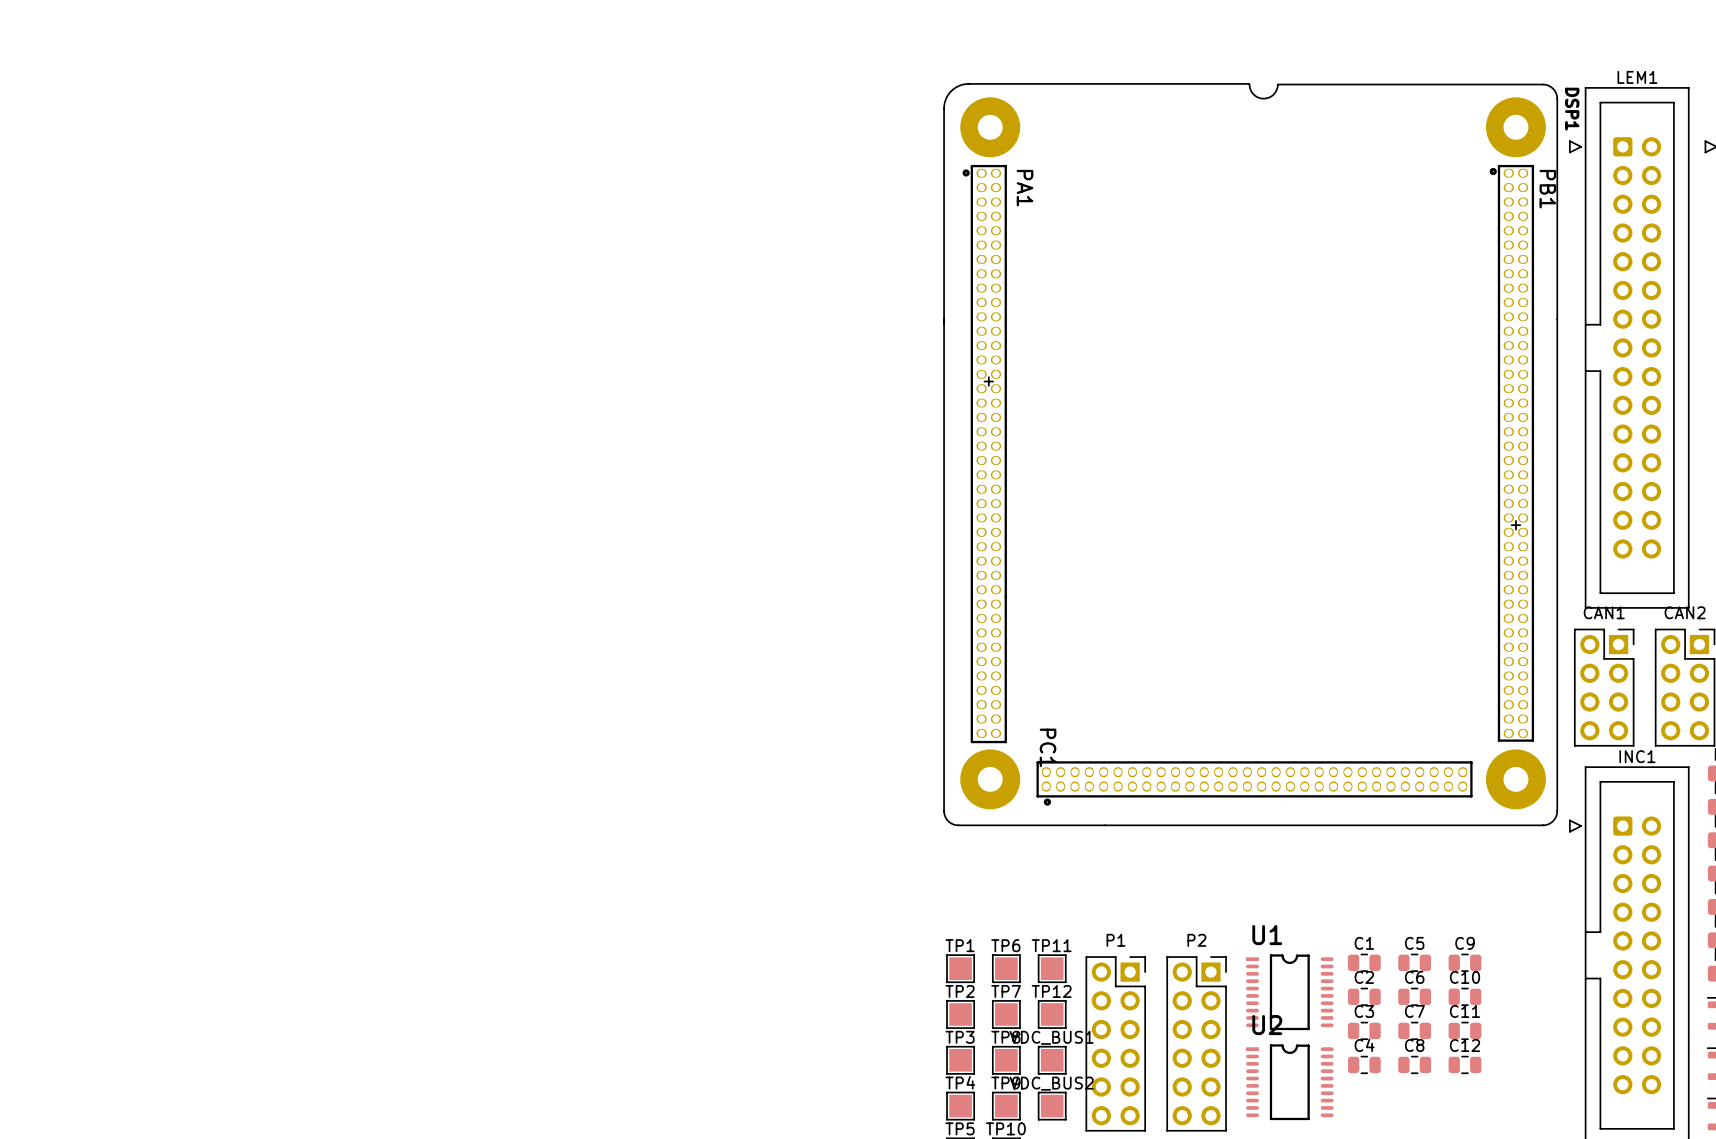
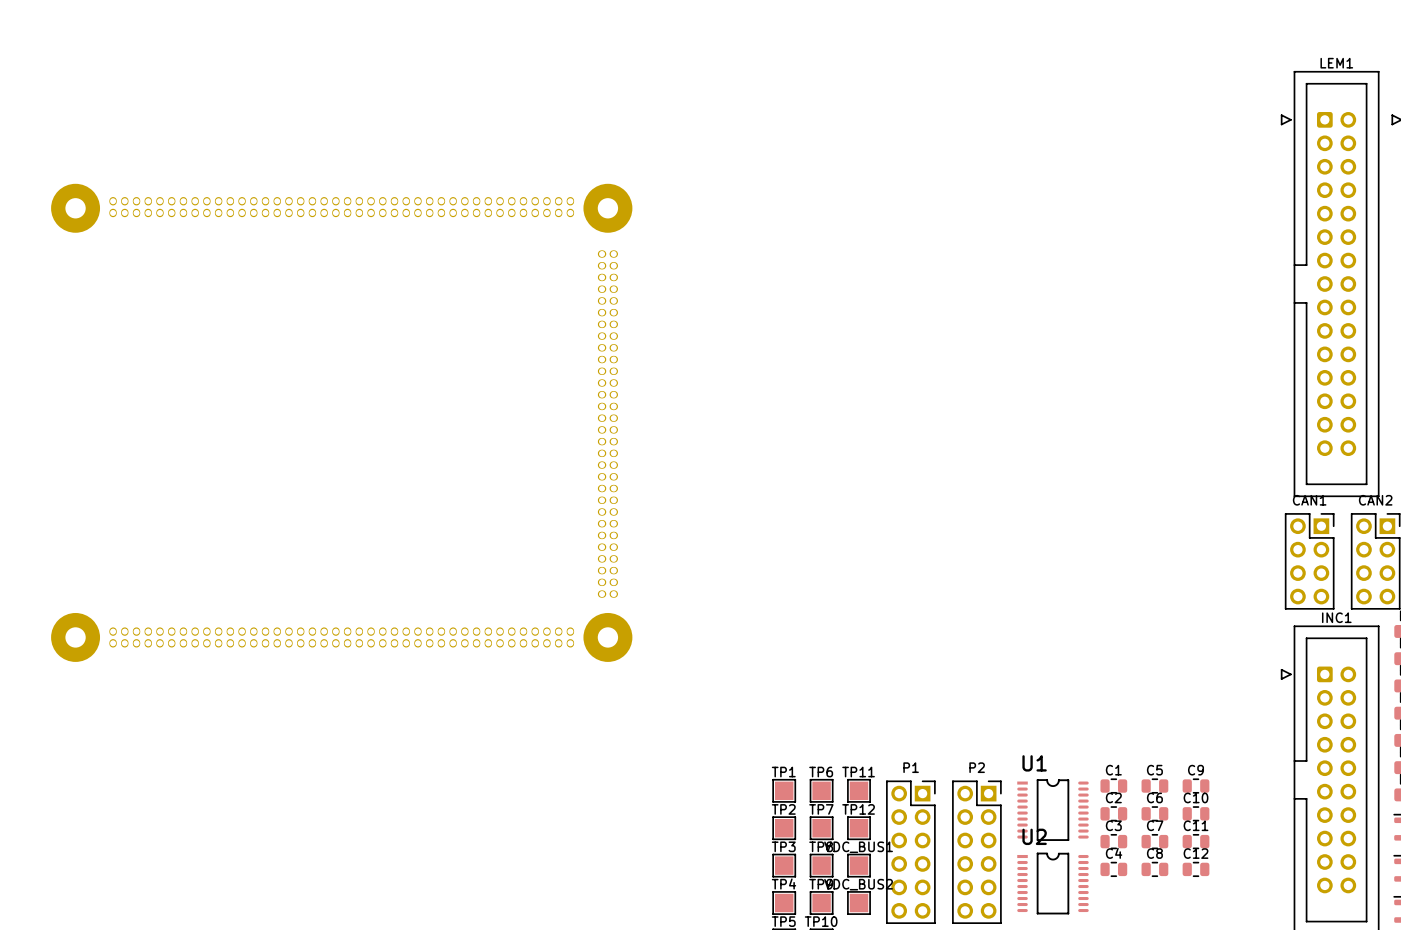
DSP1: (1250, 454) -> none
part: none -> (341, 422)

